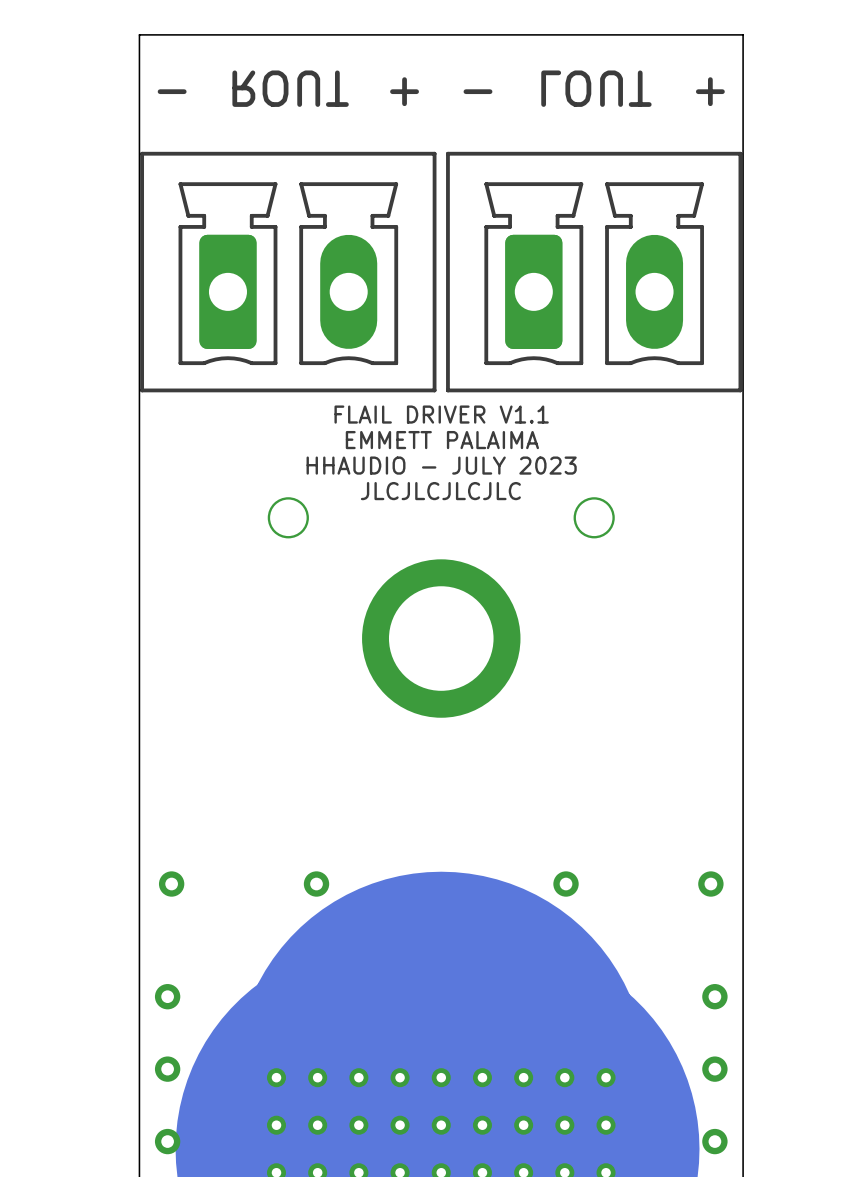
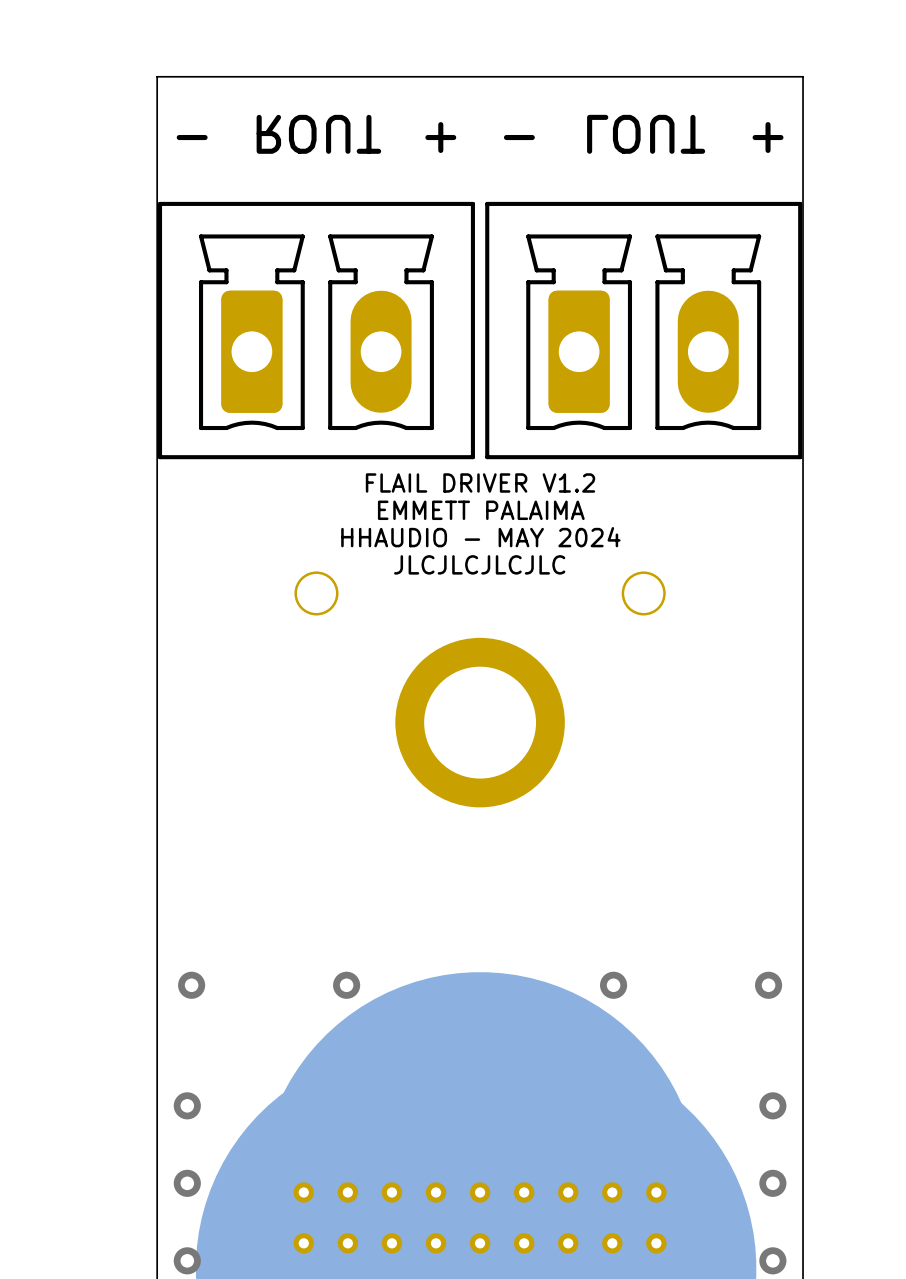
text: FLAIL DRIVER V1.1 (441, 414) -> FLAIL DRIVER V1.2 (480, 483)
text: HHAUDIO - JULY 2023 (441, 465) -> HHAUDIO - MAY 2024 (480, 537)

